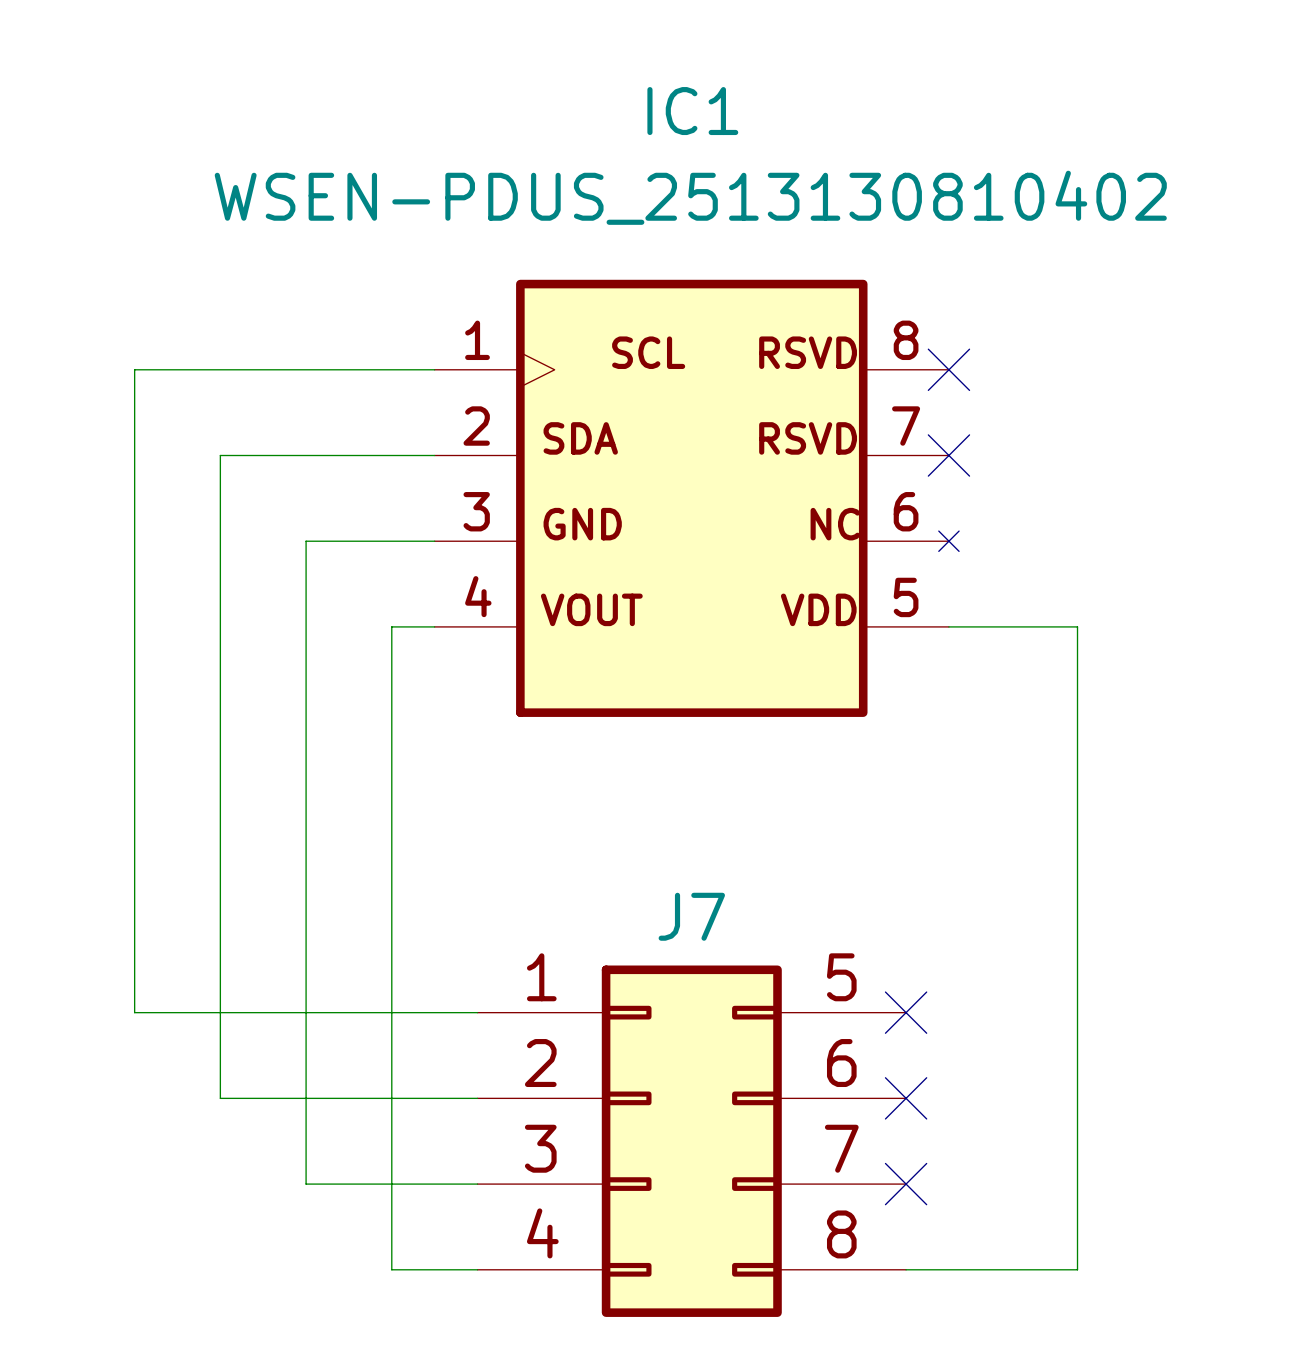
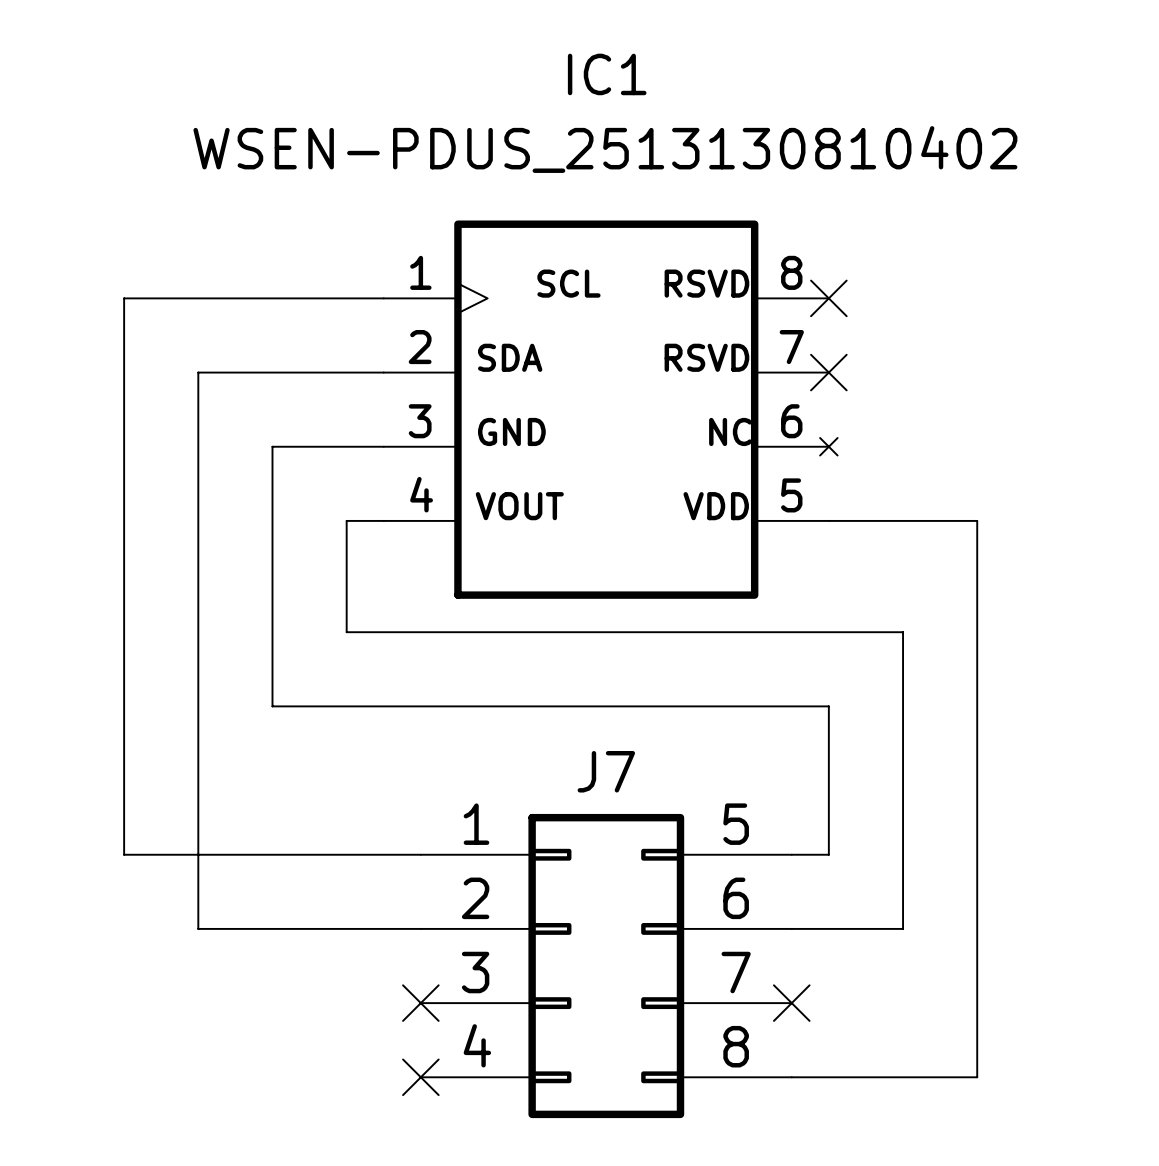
wire: (1077, 626) (1077, 1269) -> (940, 520) (977, 520) (977, 1077) (940, 1077)
wire: (391, 755) (391, 1269) (477, 1269) -> (346, 632) (903, 632) (903, 928) (791, 928)
wire: (306, 841) (306, 1184) (477, 1184) -> (272, 706) (828, 706) (828, 854) (791, 854)
no-connect mark: (906, 1012) -> none
no-connect mark: (906, 1098) -> none
no-connect mark: none -> (420, 1003)
no-connect mark: none -> (420, 1077)

